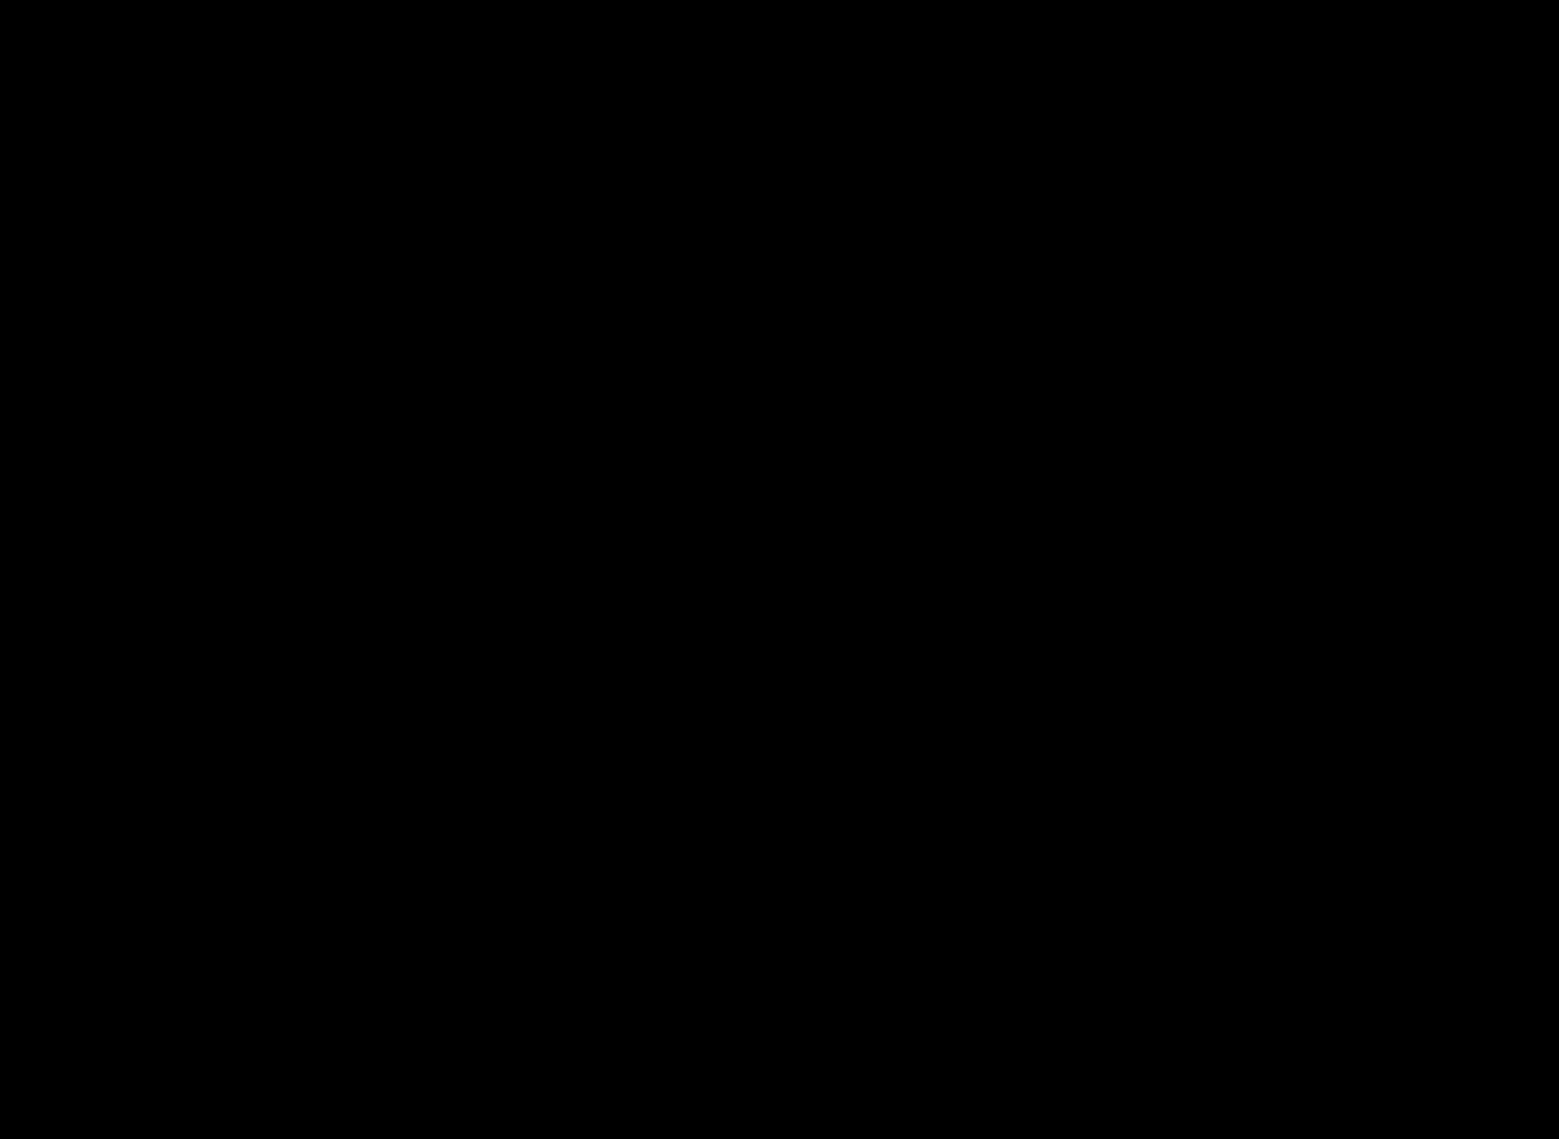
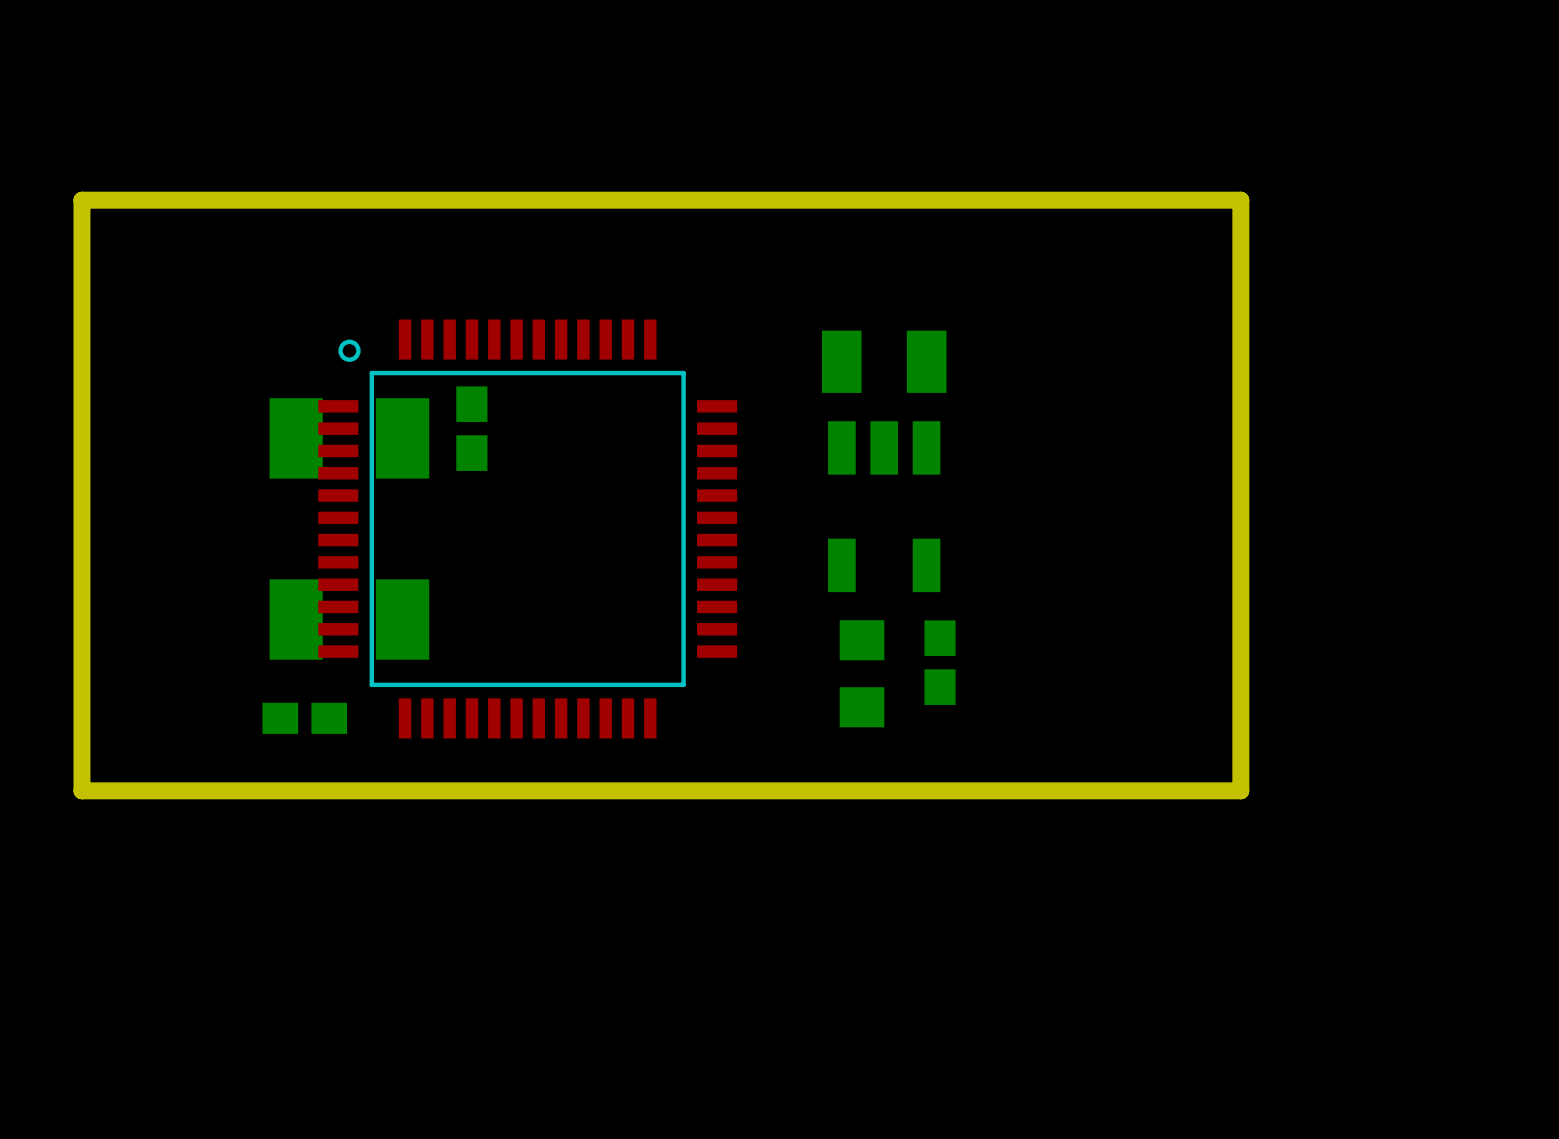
board edge: none -> (81, 200) (81, 790) (1240, 790) (1240, 200) (81, 200)
part: none -> (884, 361)
part: none -> (471, 428)
part: none -> (884, 506)
part: none -> (349, 528)
part: none -> (527, 528)
part: none -> (940, 662)
part: none -> (862, 673)
part: none -> (304, 718)

